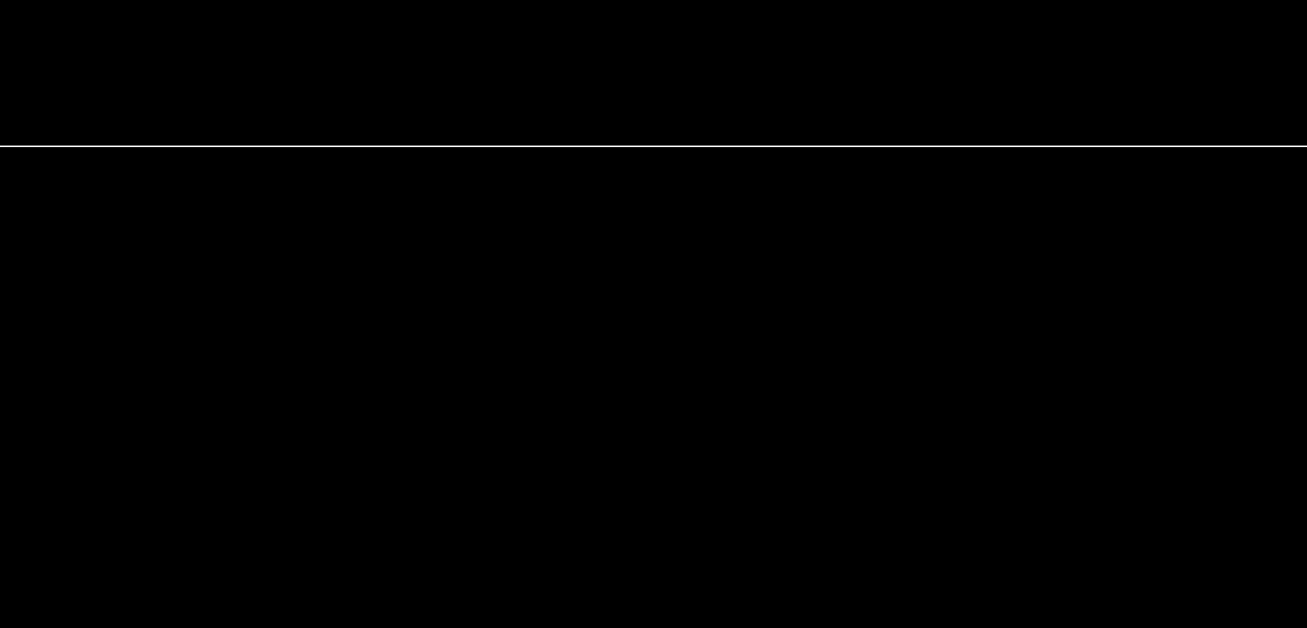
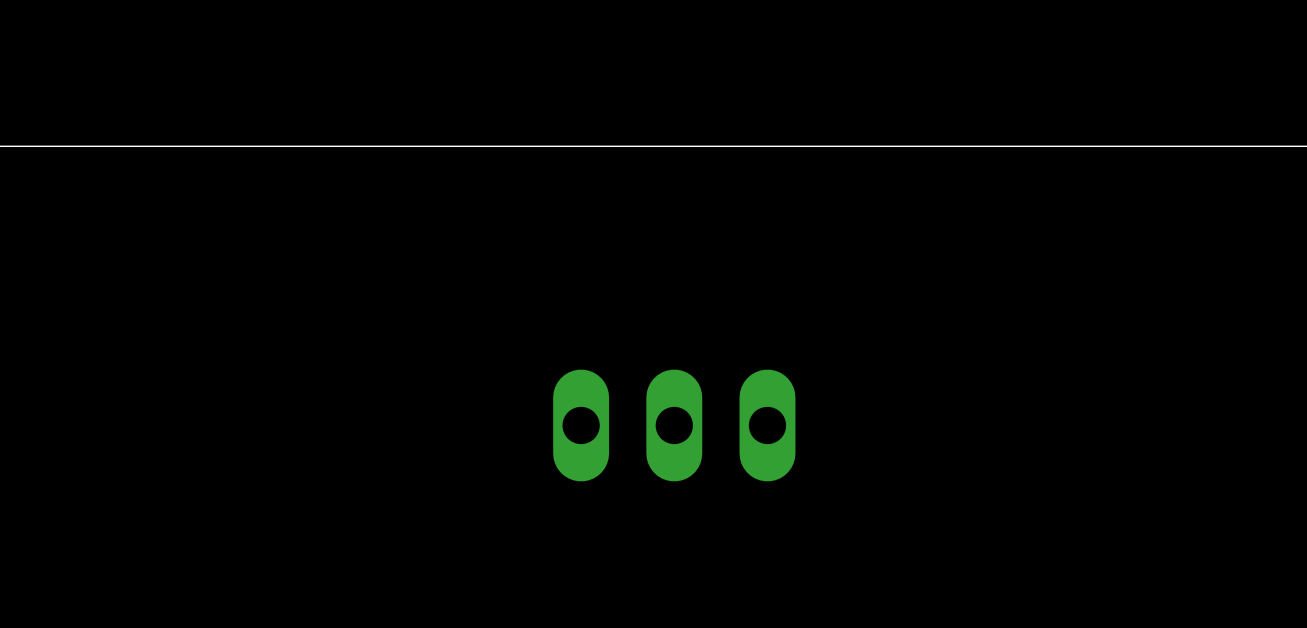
part: none -> (674, 425)

